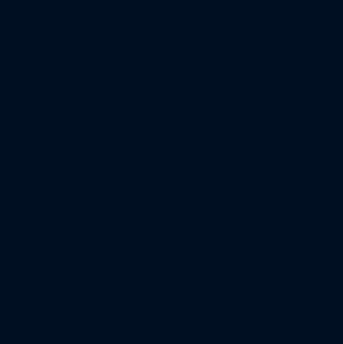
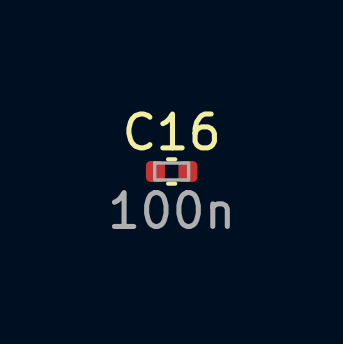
C16: none -> 100n (171, 171)

